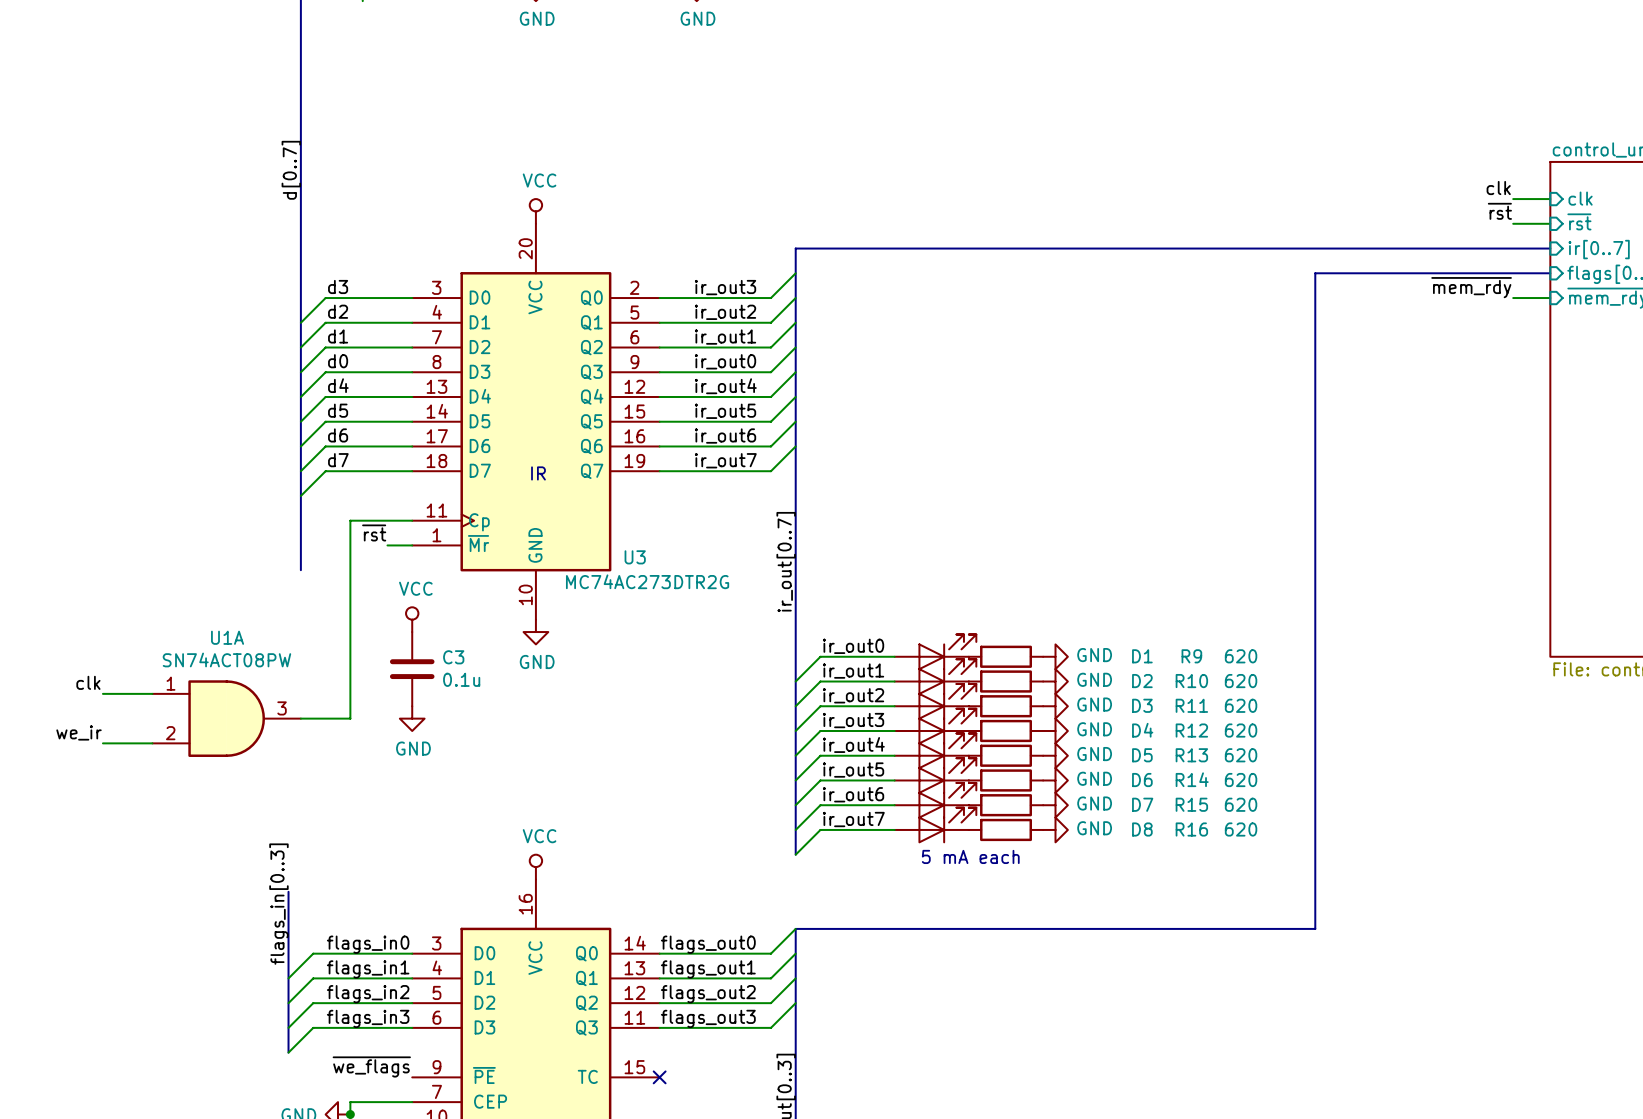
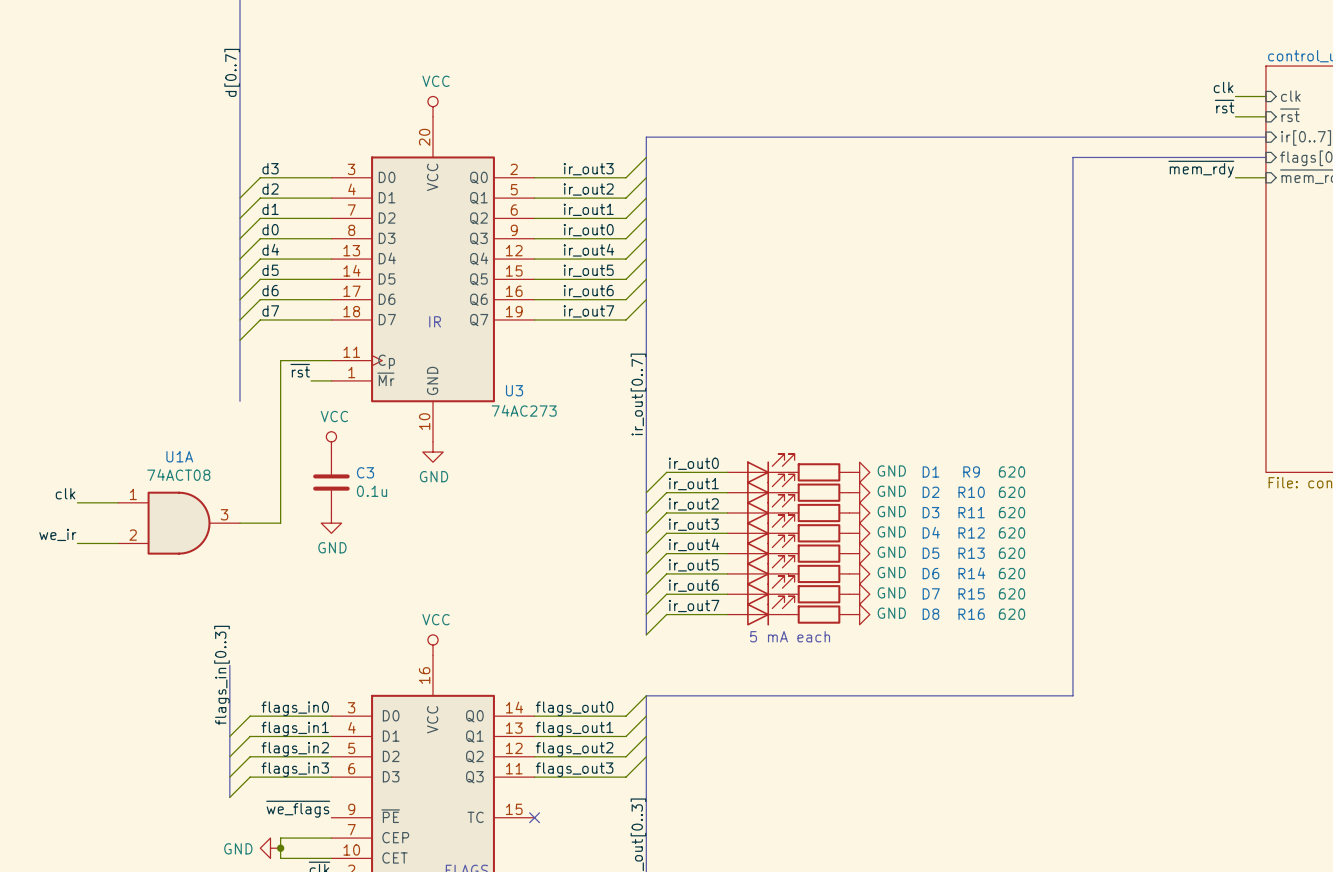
U3 value: MC74AC273DTR2G (647, 581) -> 74AC273 (524, 410)
U1A value: SN74ACT08PW (226, 659) -> 74ACT08 (178, 474)

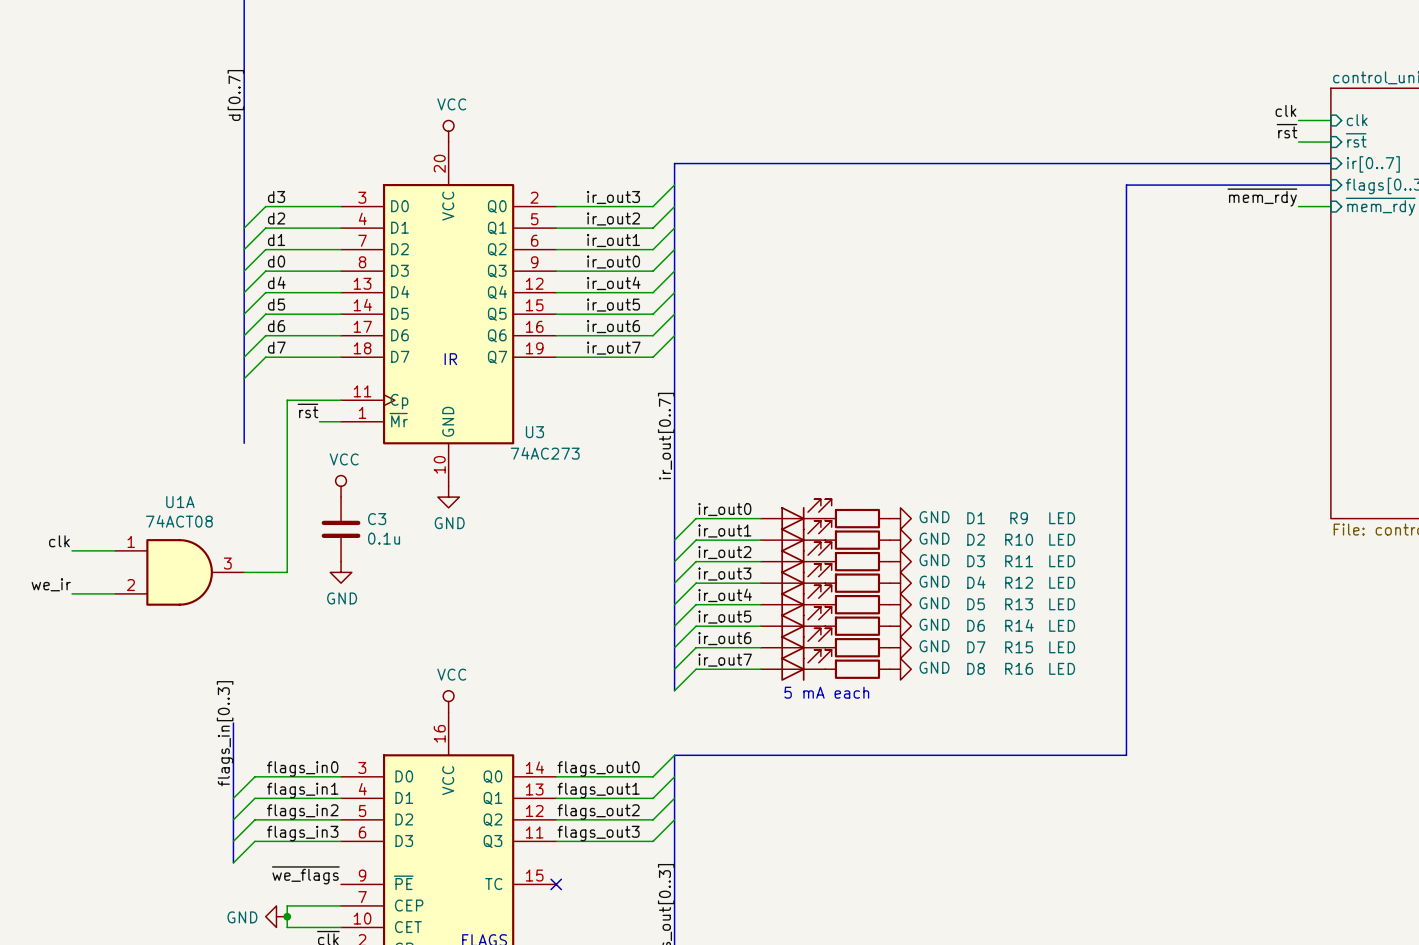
R9 value: 620 (1012, 471) -> LED (1062, 518)
R10 value: 620 (1012, 492) -> LED (1062, 539)
R11 value: 620 (1012, 512) -> LED (1062, 561)
R12 value: 620 (1012, 532) -> LED (1062, 582)
R13 value: 620 (1012, 553) -> LED (1062, 604)
R14 value: 620 (1012, 573) -> LED (1062, 625)
R15 value: 620 (1012, 593) -> LED (1062, 647)
R16 value: 620 (1012, 614) -> LED (1062, 668)

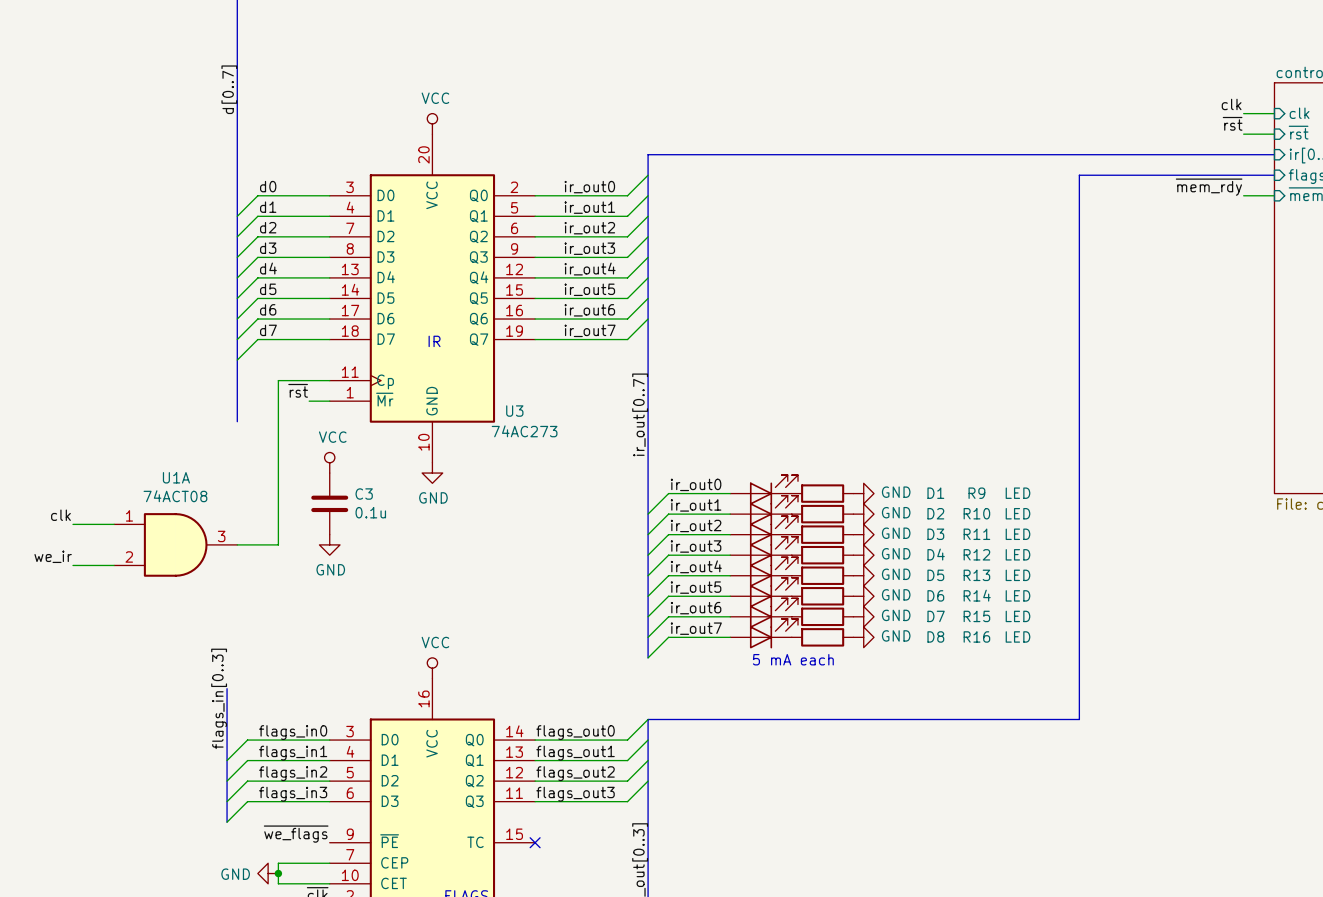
label: d3 (276, 196) -> d0 (268, 186)
label: ir_out3 (613, 197) -> ir_out0 (589, 187)
label: d2 (276, 218) -> d1 (268, 207)
label: ir_out2 (613, 219) -> ir_out1 (589, 207)
label: d1 (276, 240) -> d2 (268, 227)
label: ir_out1 (613, 240) -> ir_out2 (589, 228)
label: d0 (276, 261) -> d3 (268, 248)
label: ir_out0 (613, 262) -> ir_out3 (589, 248)

